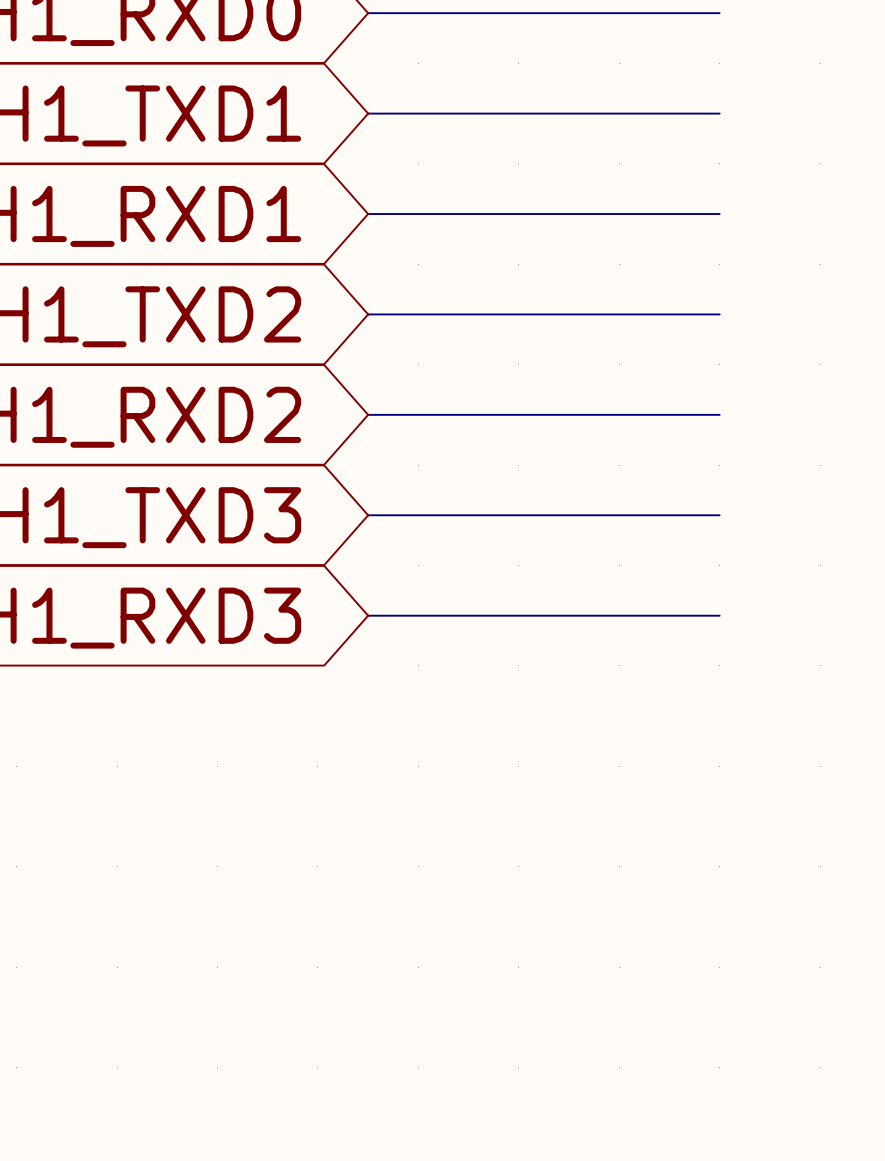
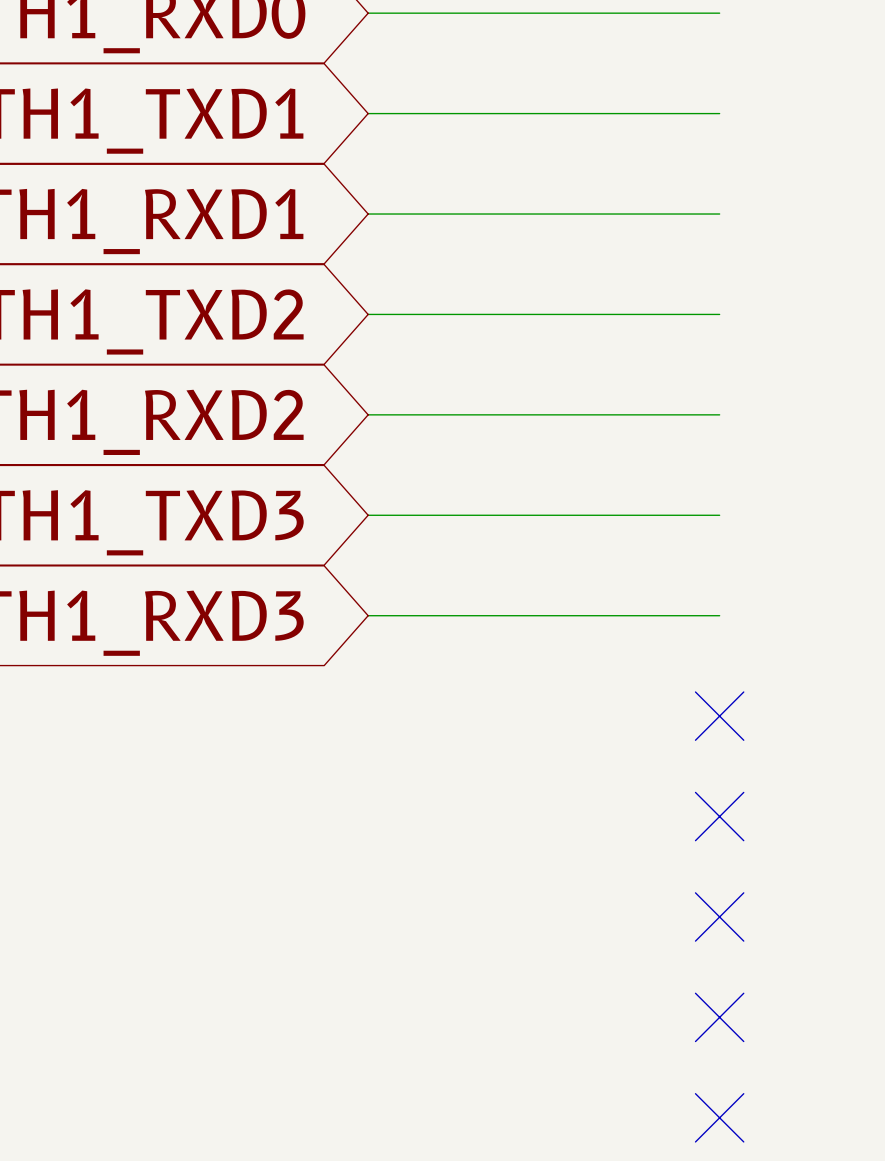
no-connect mark: none -> (719, 716)
no-connect mark: none -> (719, 816)
no-connect mark: none -> (719, 916)
no-connect mark: none -> (719, 1017)
no-connect mark: none -> (719, 1117)

